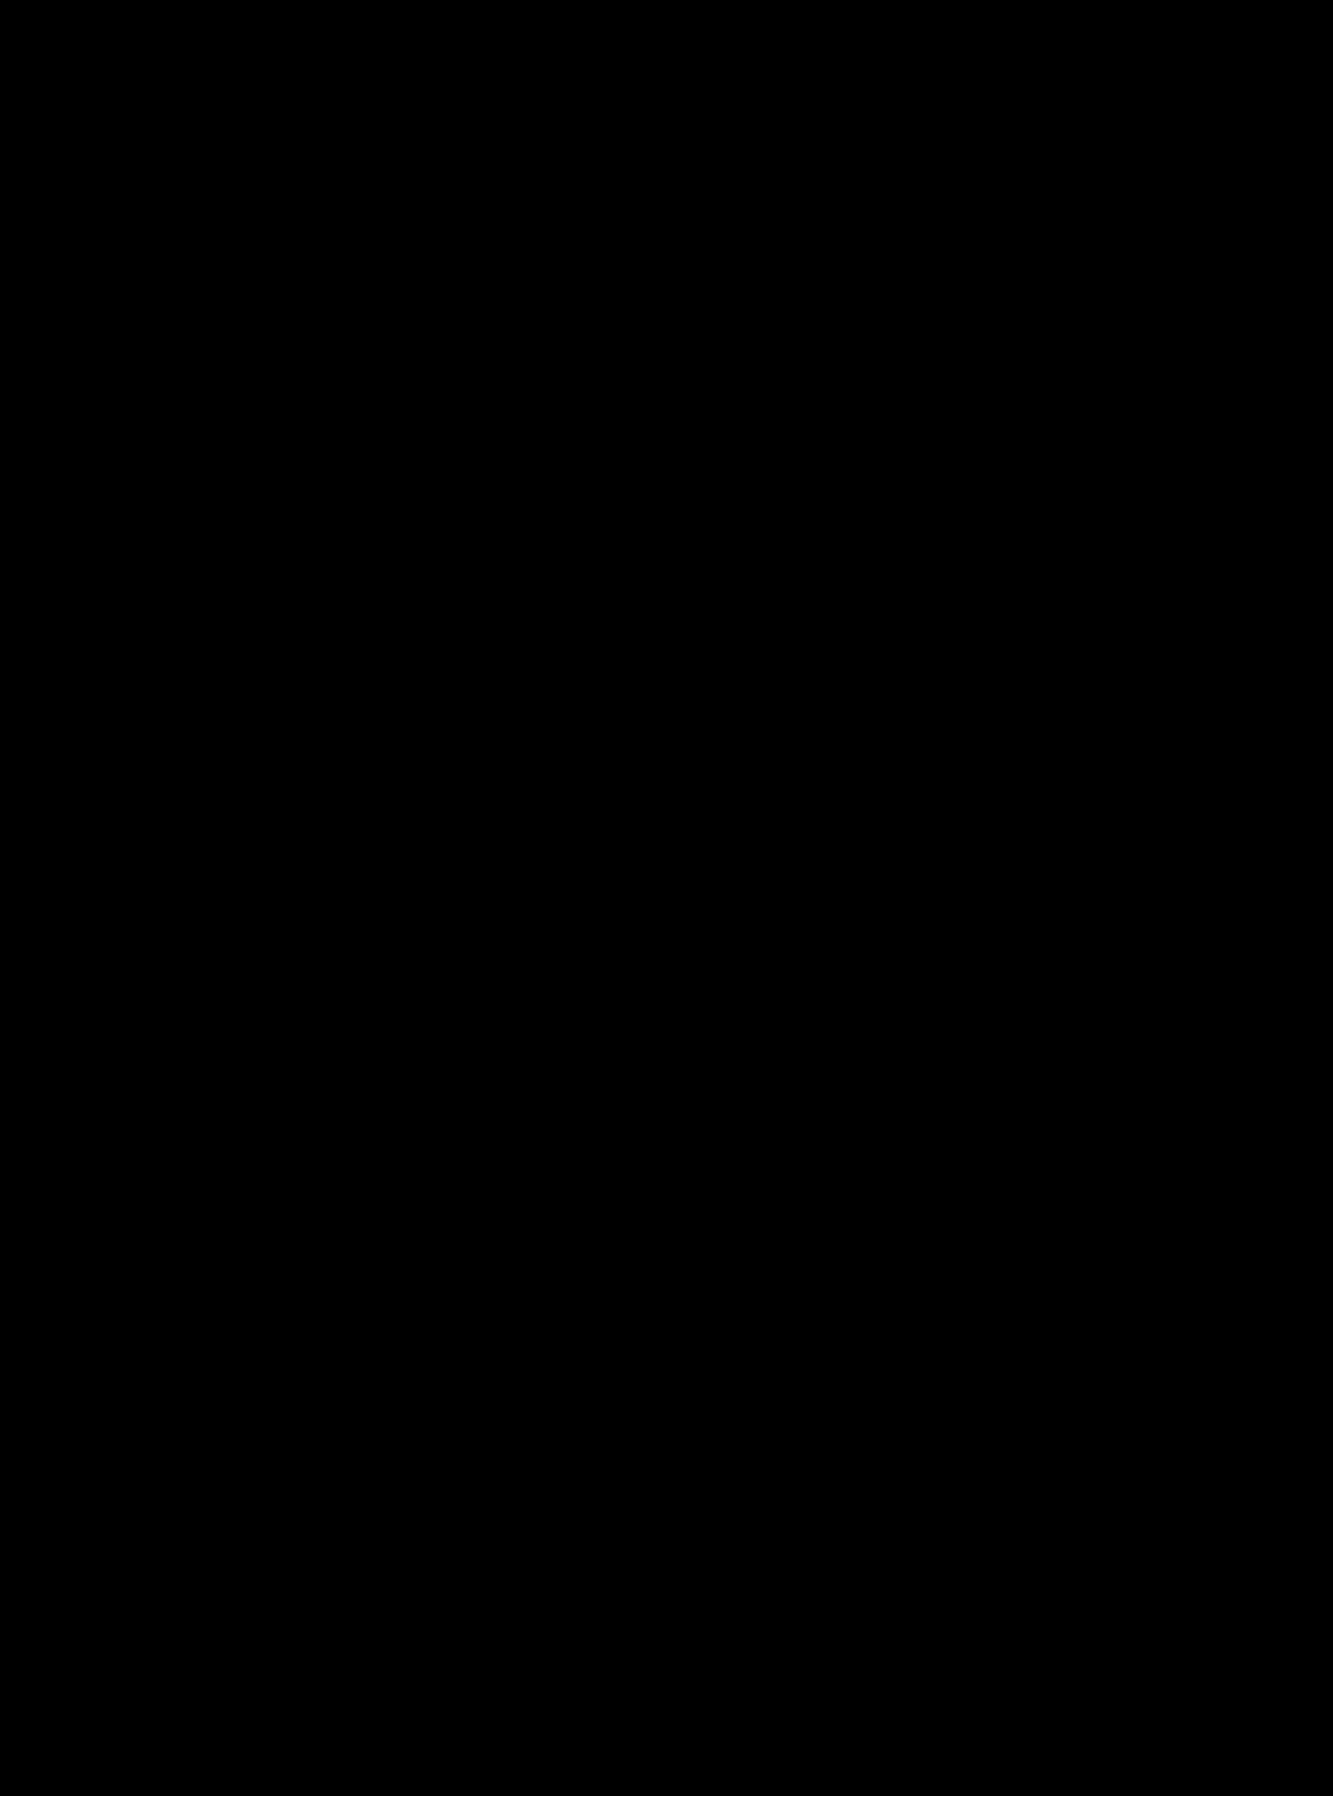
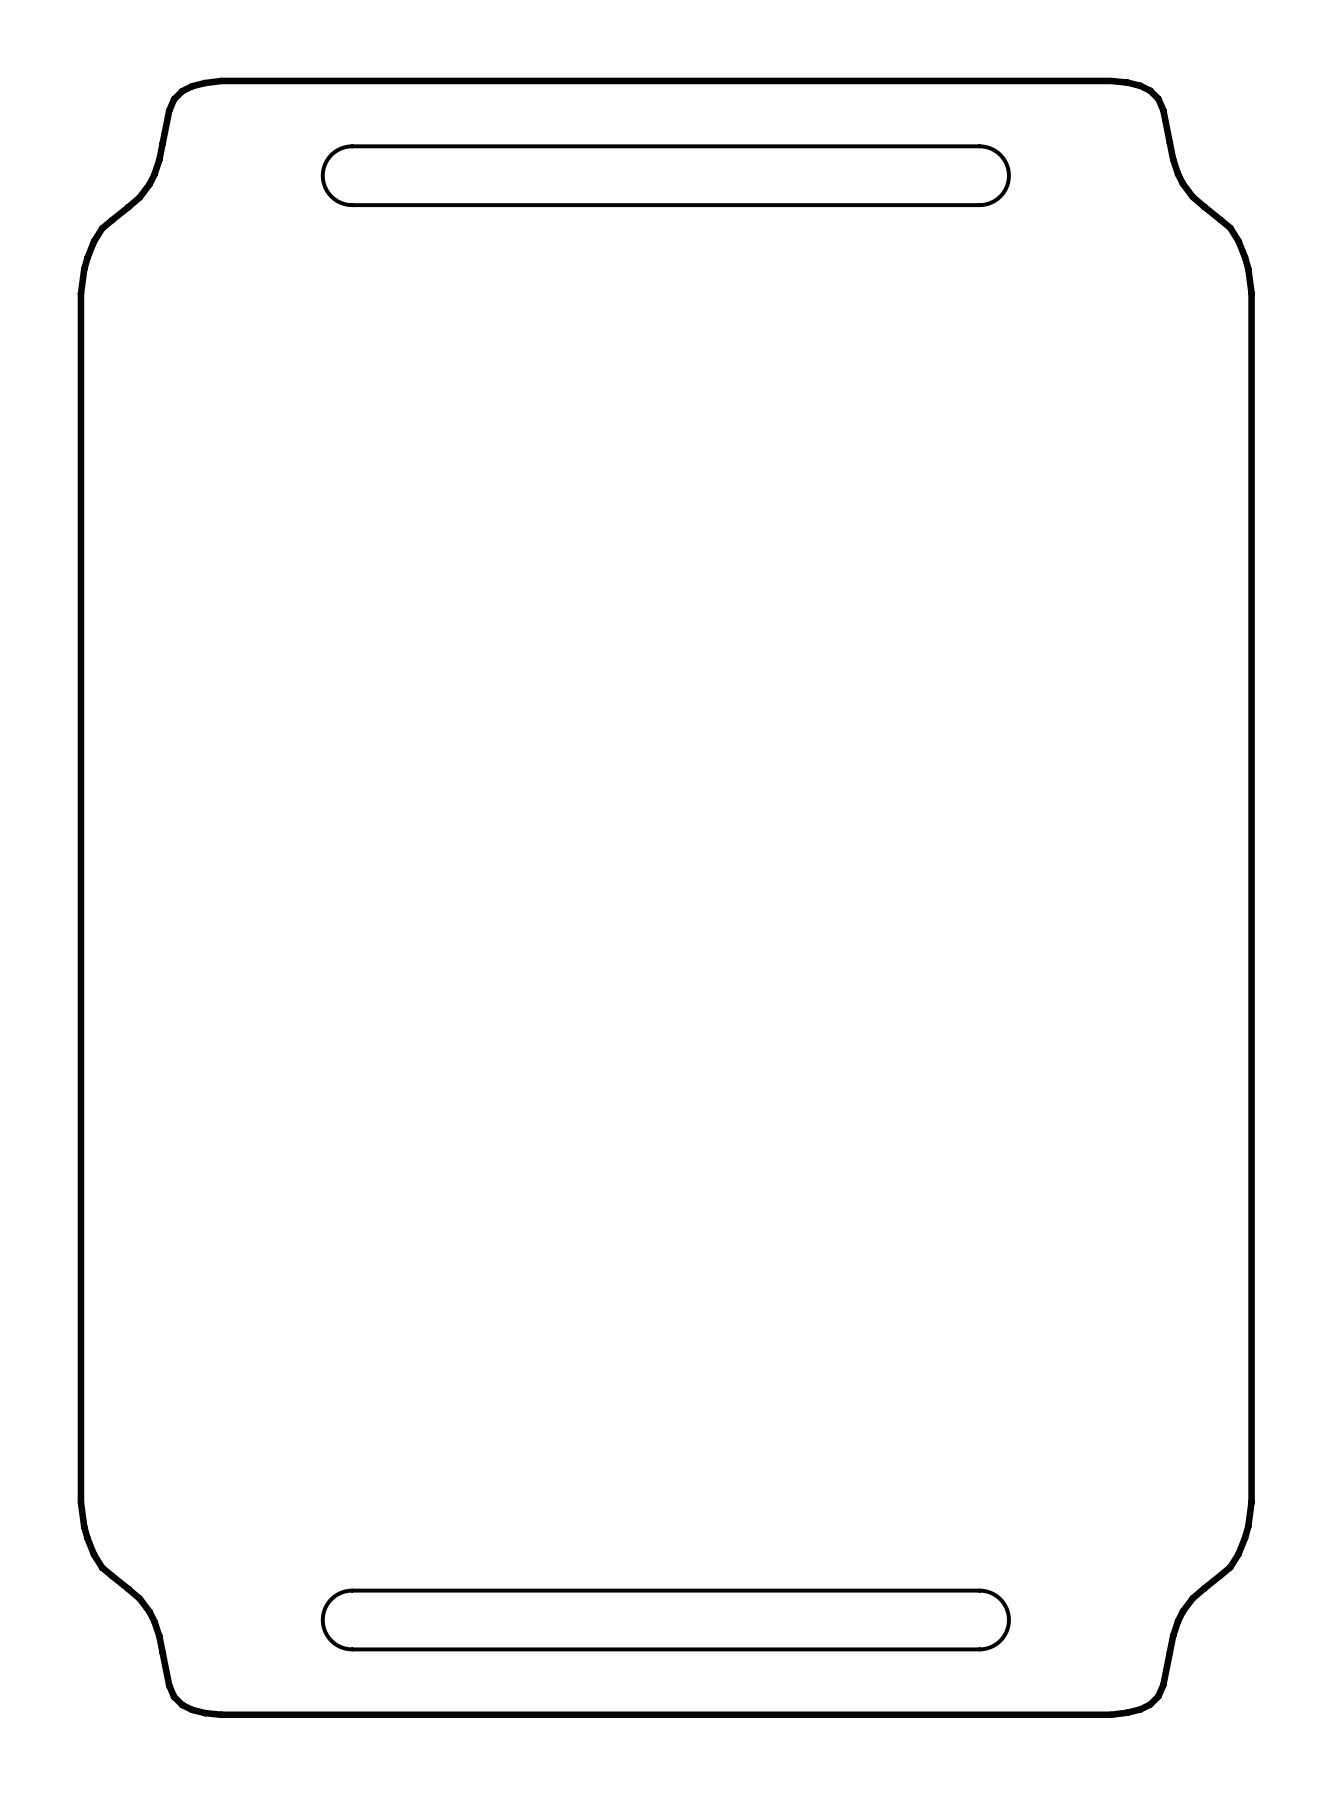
board edge: none -> (1110, 80) (221, 80) (205, 83) (182, 91) (174, 99) (169, 110) (154, 174) (139, 197) (102, 228) (94, 241) (84, 269) (80, 293)
board edge: none -> (1111, 80) (1140, 85) (1150, 90) (1158, 98) (1163, 110) (1178, 174) (1192, 196) (1230, 228) (1238, 241) (1248, 268) (1251, 293) (1251, 1502)
board edge: none -> (352, 146) (979, 146) (990, 148) (1000, 154) (1006, 164) (1008, 175) (1006, 186) (1000, 196) (990, 202) (979, 205) (352, 205) (340, 202) (331, 196) (325, 186) (322, 175) (325, 164) (331, 154) (340, 148) (352, 146)
board edge: none -> (80, 293) (80, 1502) (84, 1526) (94, 1554) (102, 1567) (139, 1598) (154, 1621) (169, 1685) (174, 1696) (182, 1704) (192, 1709) (221, 1714) (1110, 1714)
board edge: none -> (1251, 1501) (1248, 1526) (1238, 1554) (1230, 1567) (1192, 1598) (1178, 1621) (1163, 1684) (1158, 1696) (1150, 1704) (1140, 1709) (1111, 1714)
board edge: none -> (352, 1590) (979, 1590) (990, 1592) (1000, 1599) (1006, 1608) (1008, 1620) (1006, 1631) (1000, 1640) (990, 1647) (979, 1649) (352, 1649) (340, 1647) (331, 1640) (325, 1631) (322, 1620) (325, 1608) (331, 1599) (340, 1592) (352, 1590)

